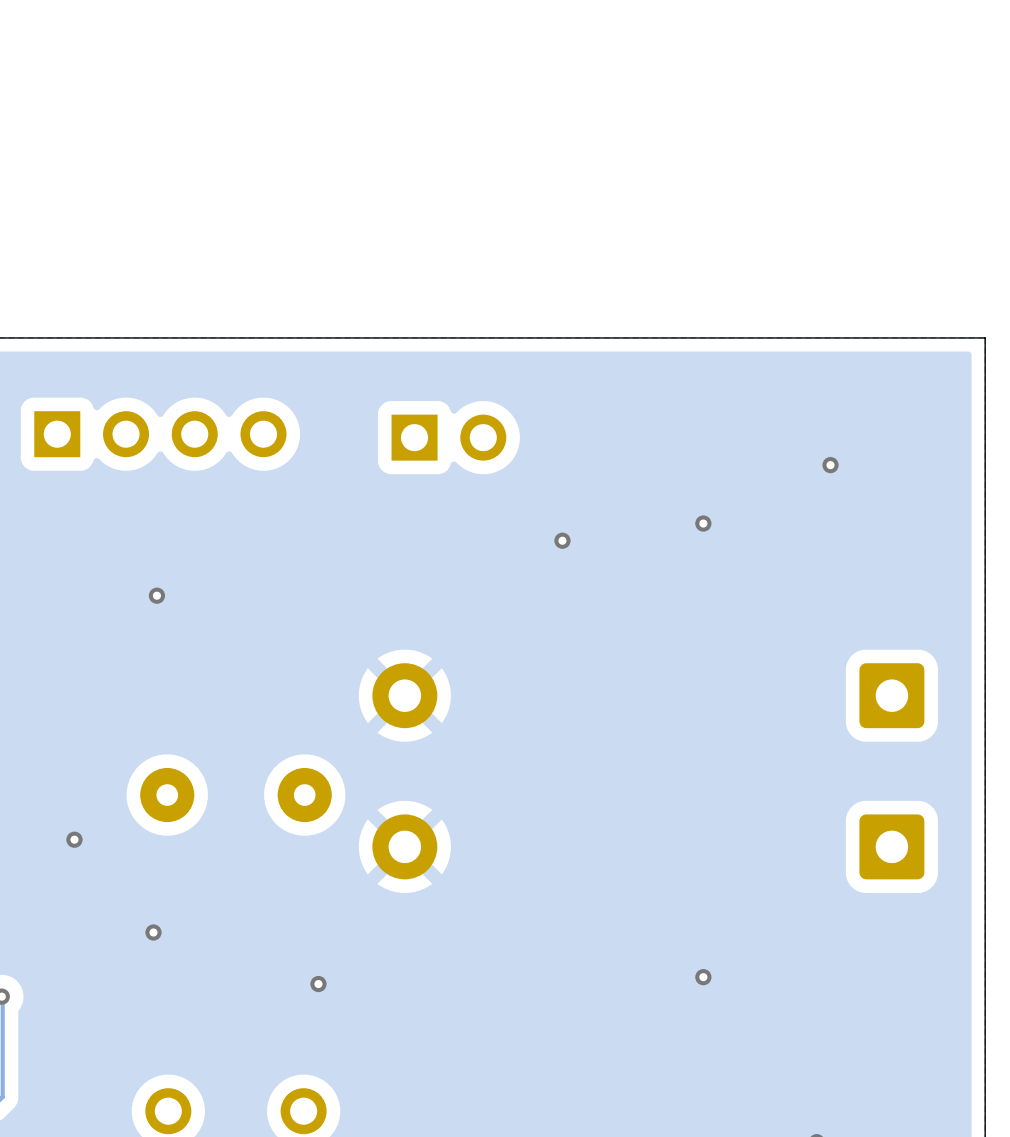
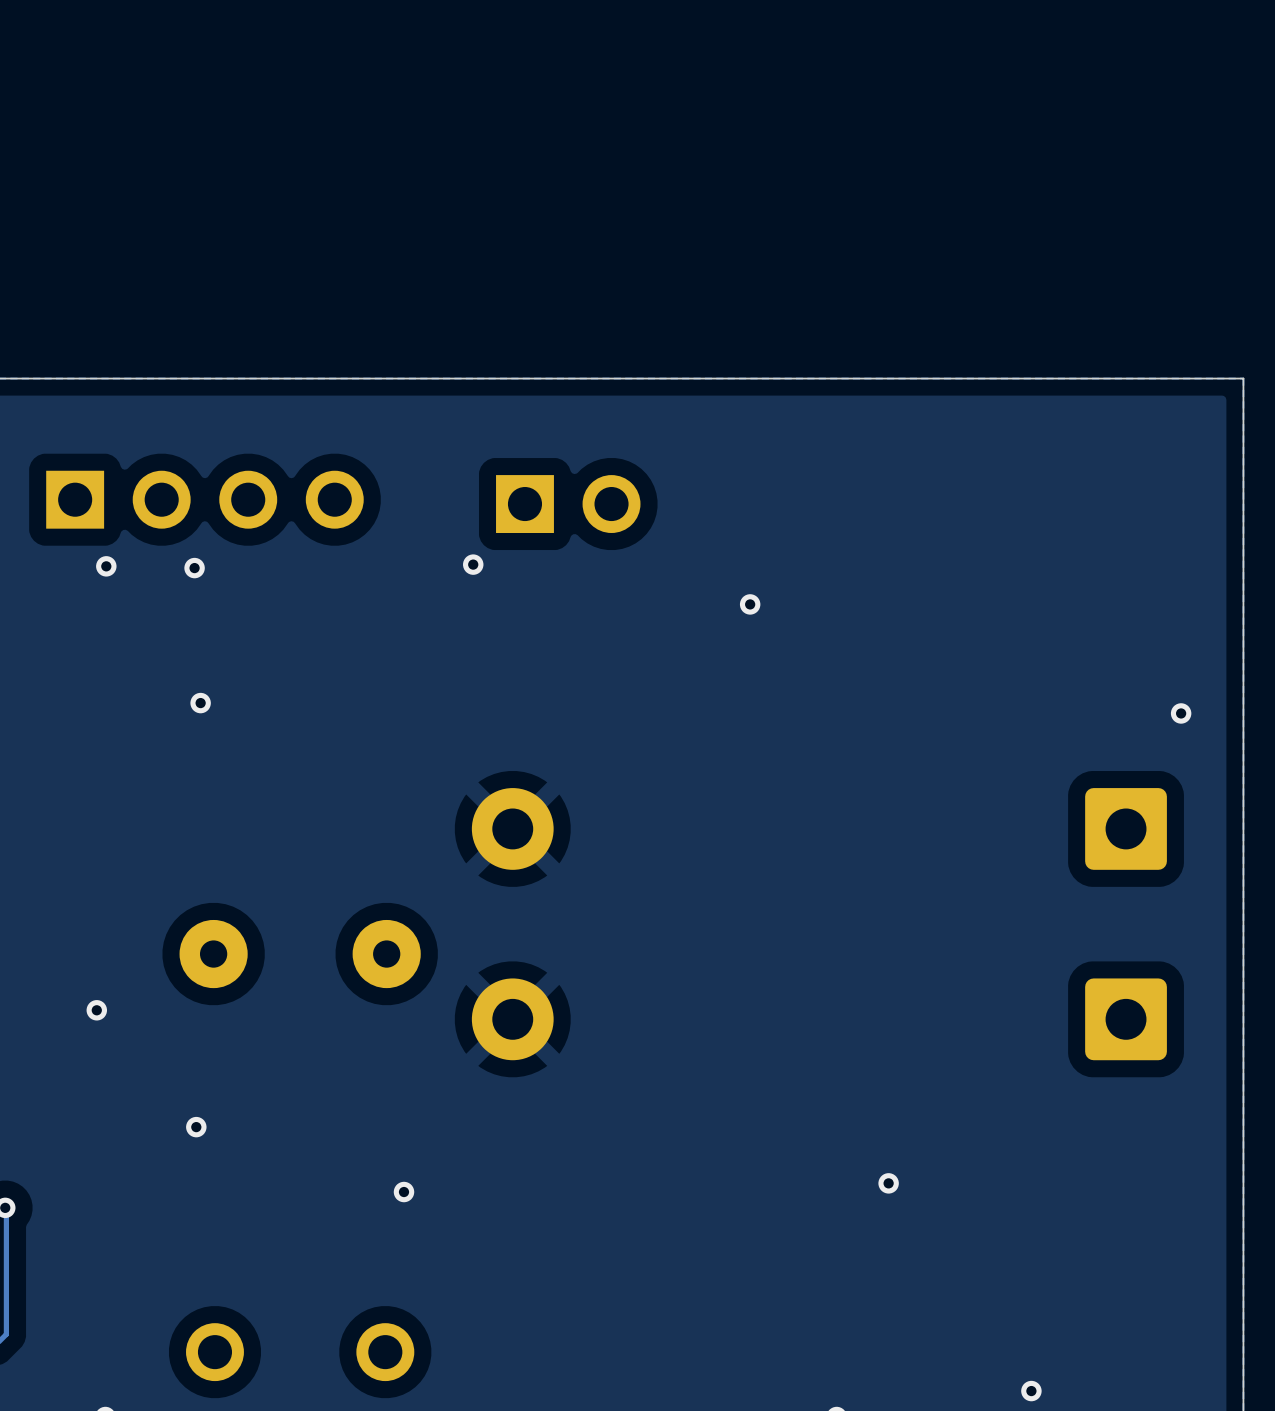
via: (830, 465) -> none
via: none -> (473, 564)
via: none -> (106, 566)
via: none -> (194, 568)
via: (703, 523) -> none
via position: (562, 540) -> (750, 604)
via: none -> (1181, 713)

